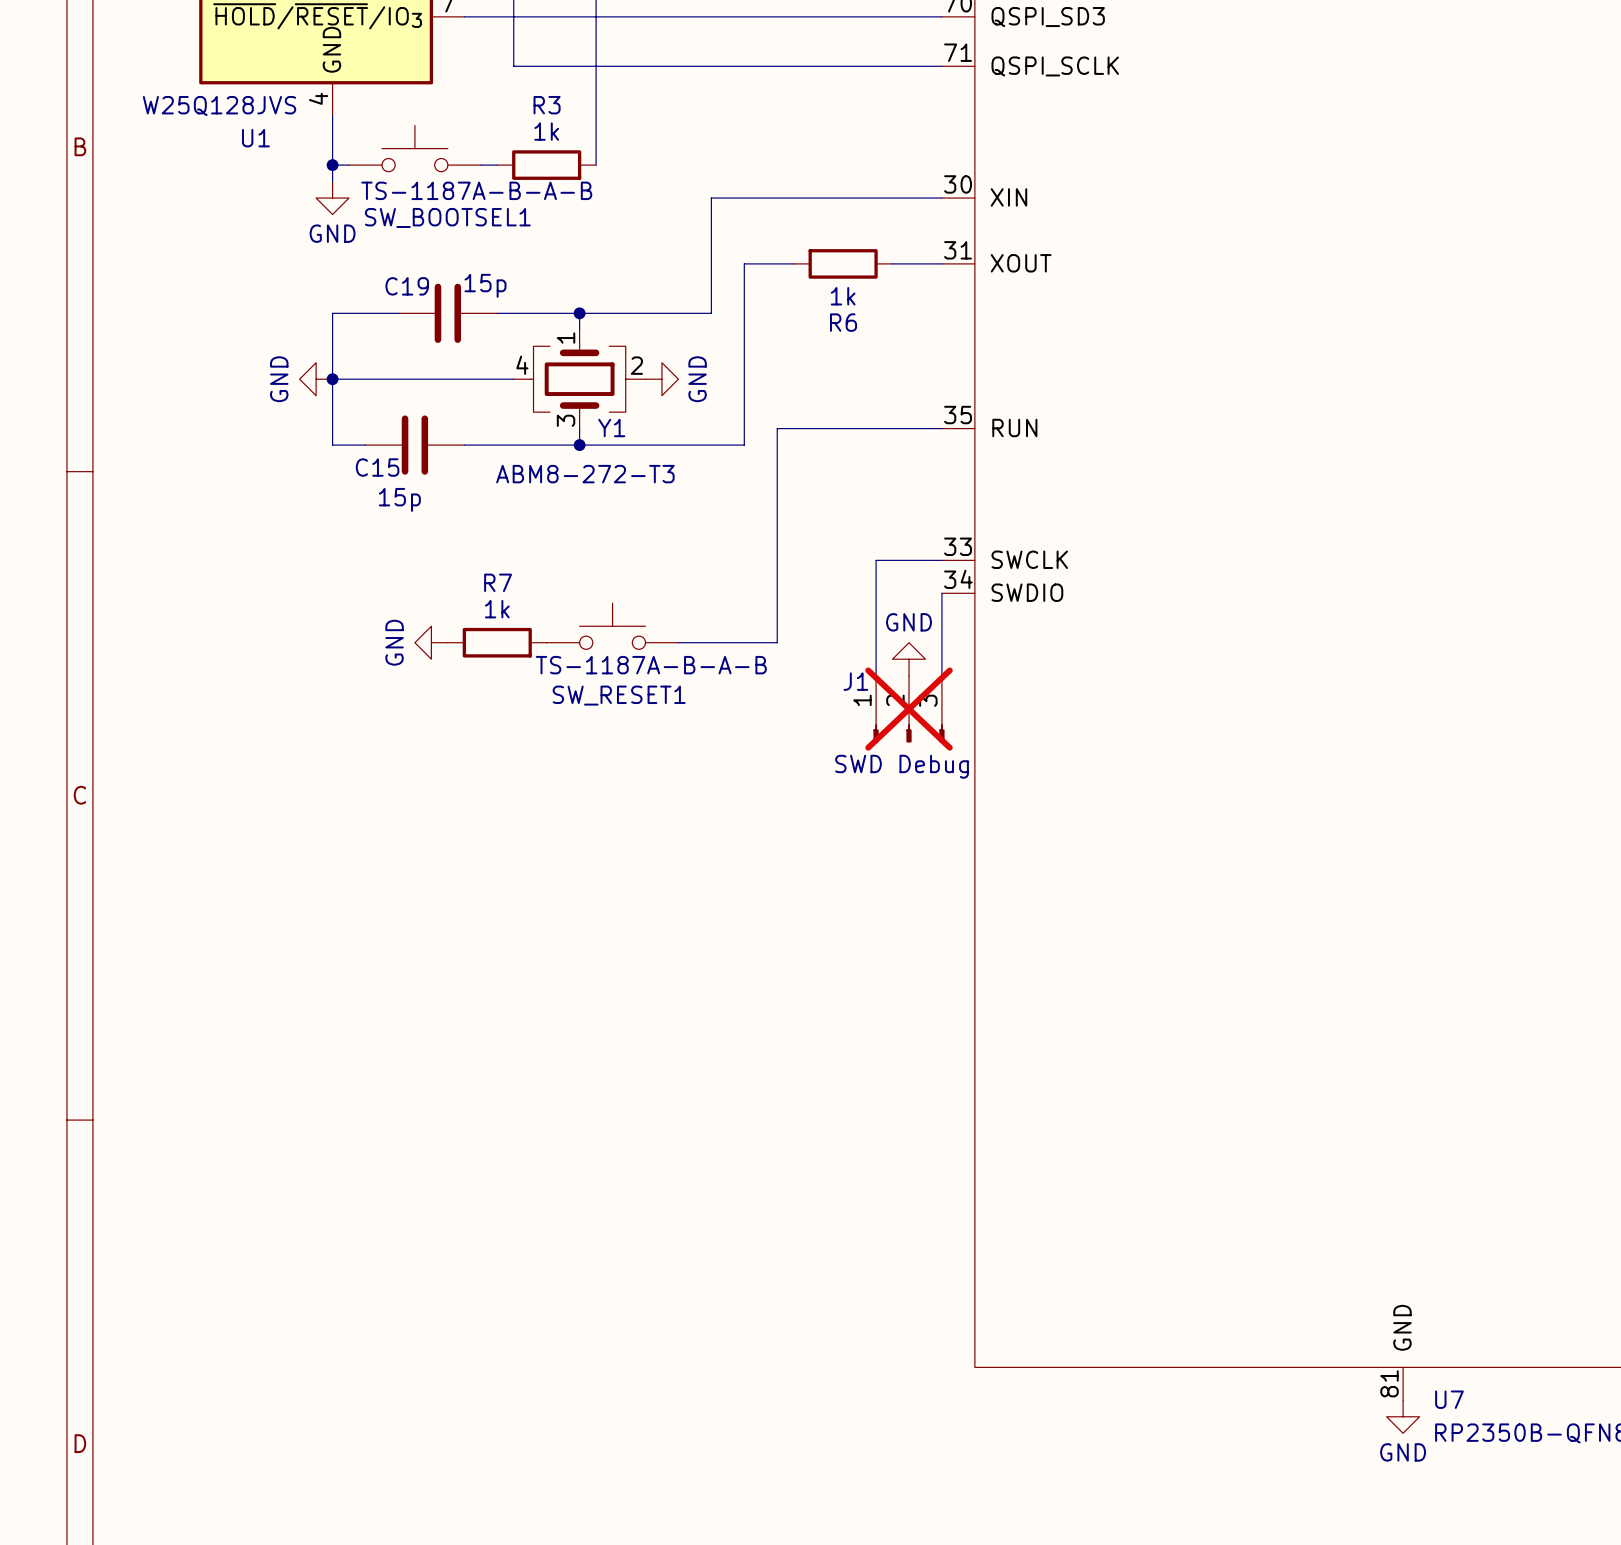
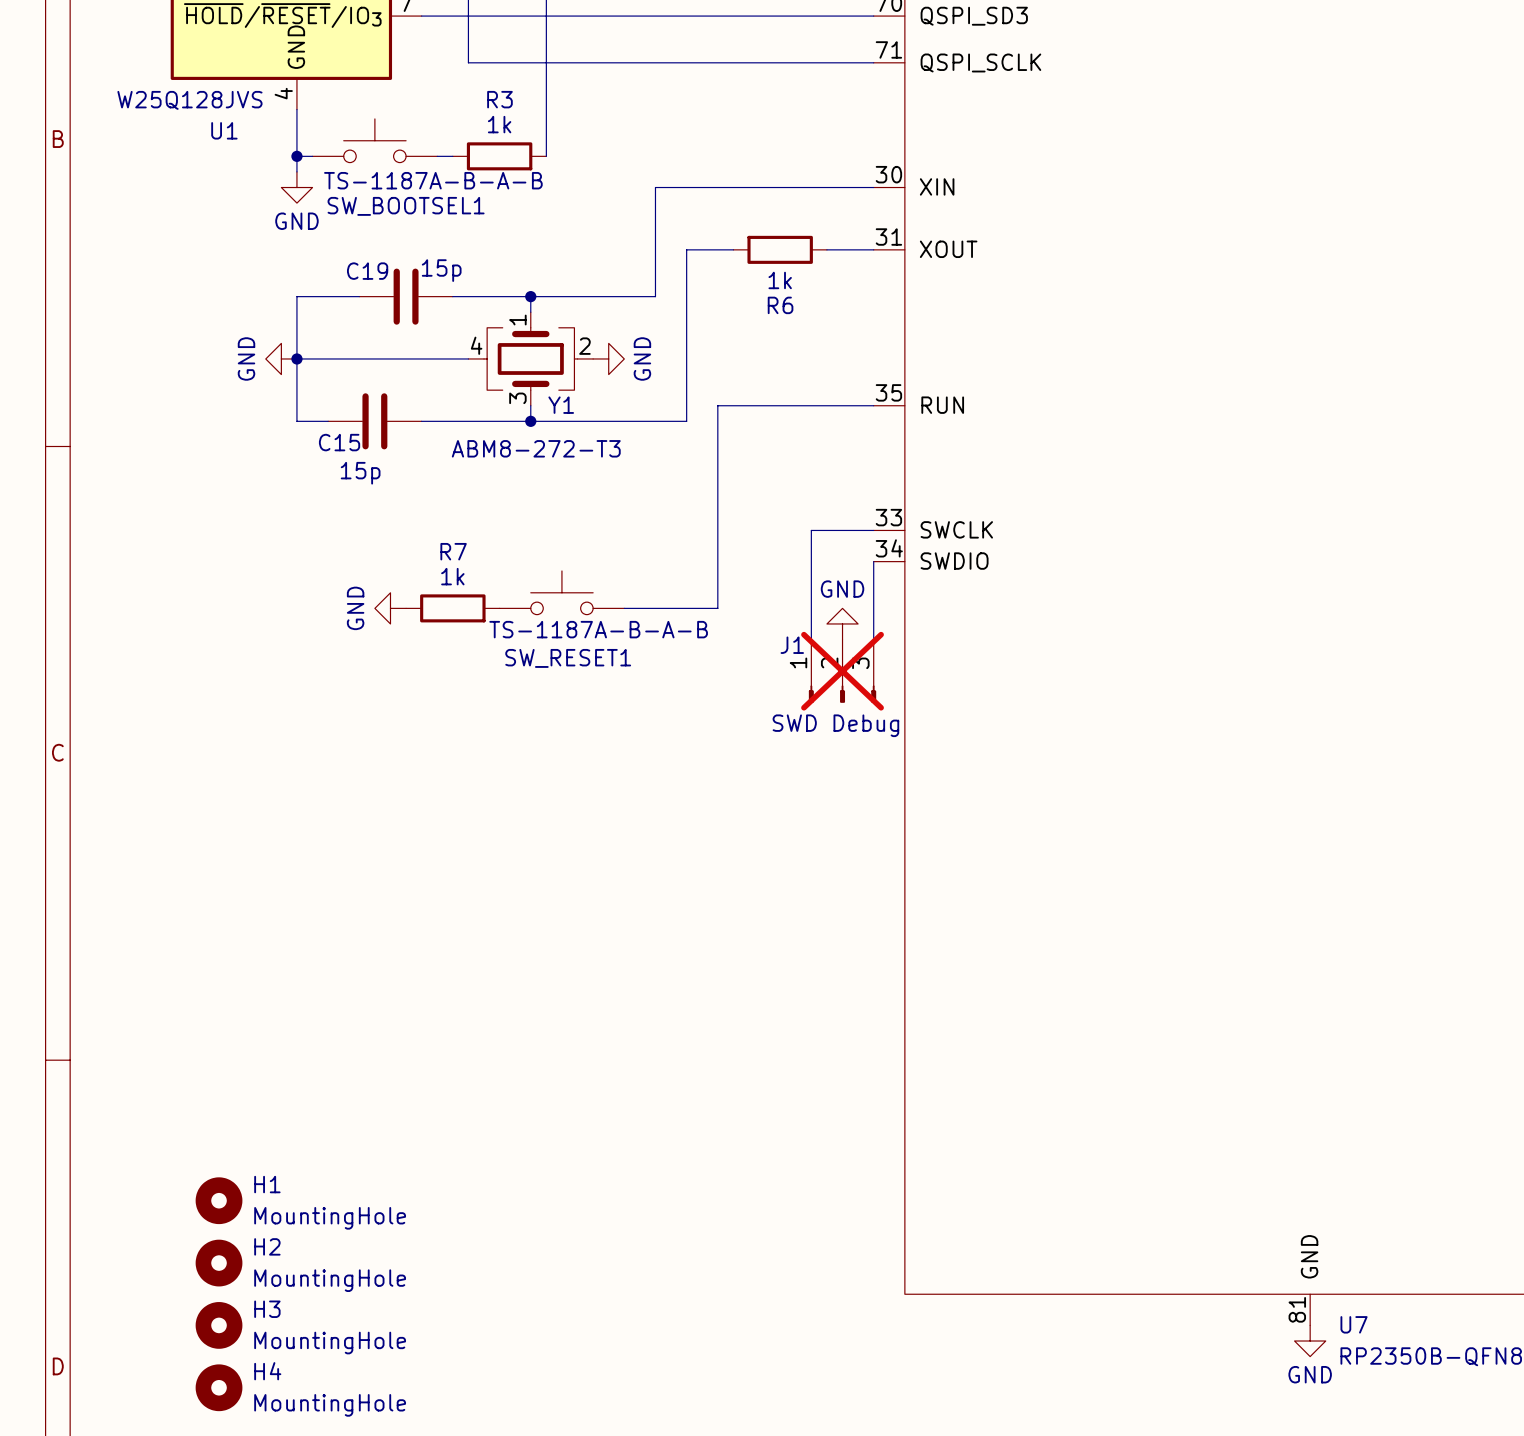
H1: none -> MountingHole (219, 1200)
H2: none -> MountingHole (219, 1263)
H3: none -> MountingHole (219, 1325)
H4: none -> MountingHole (219, 1387)

